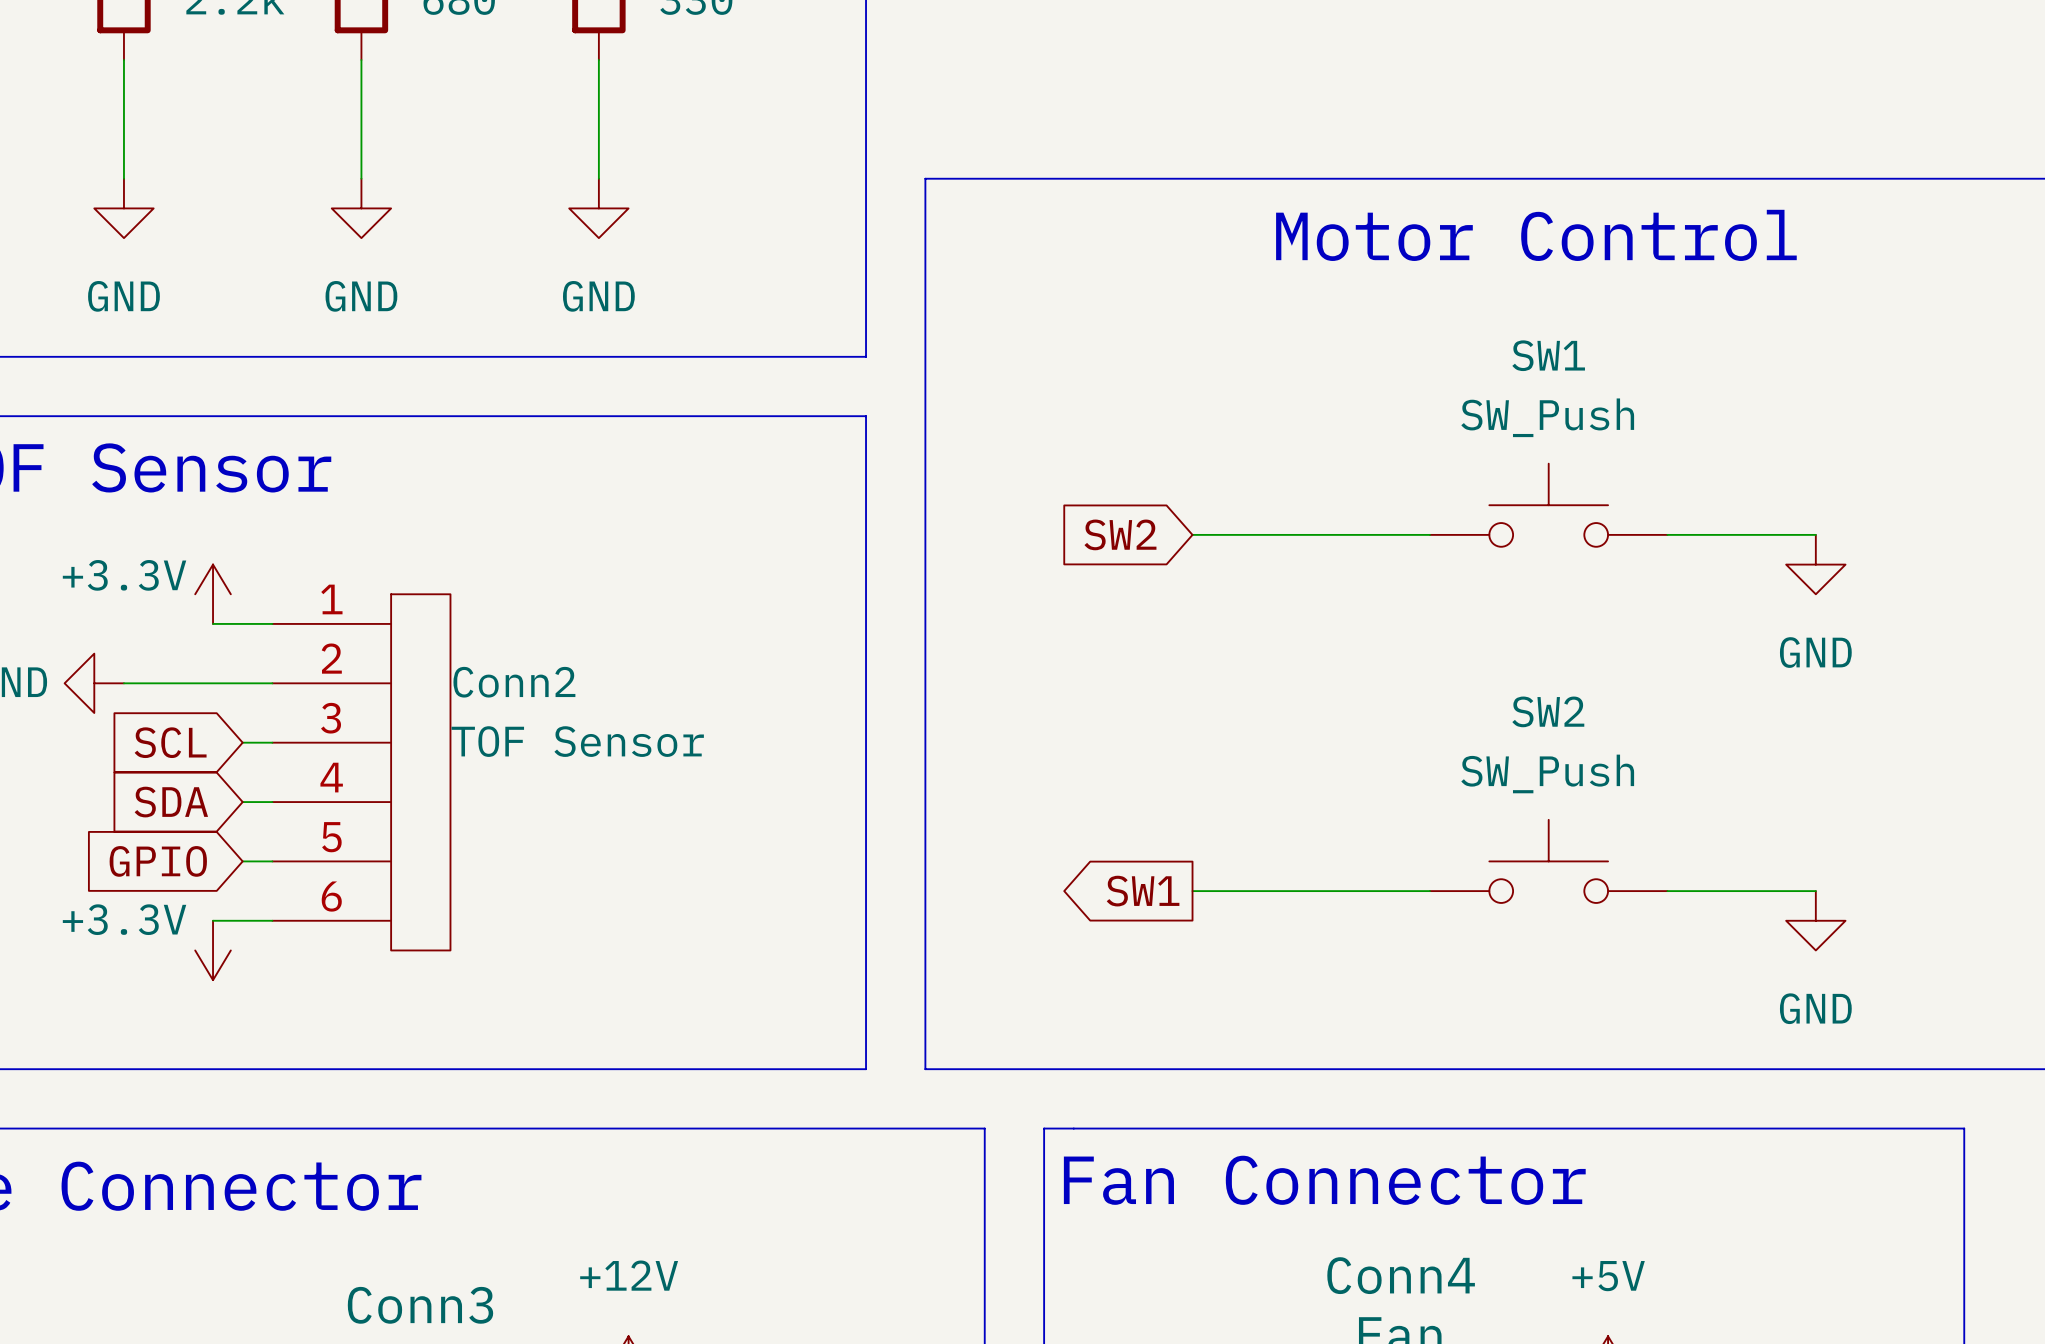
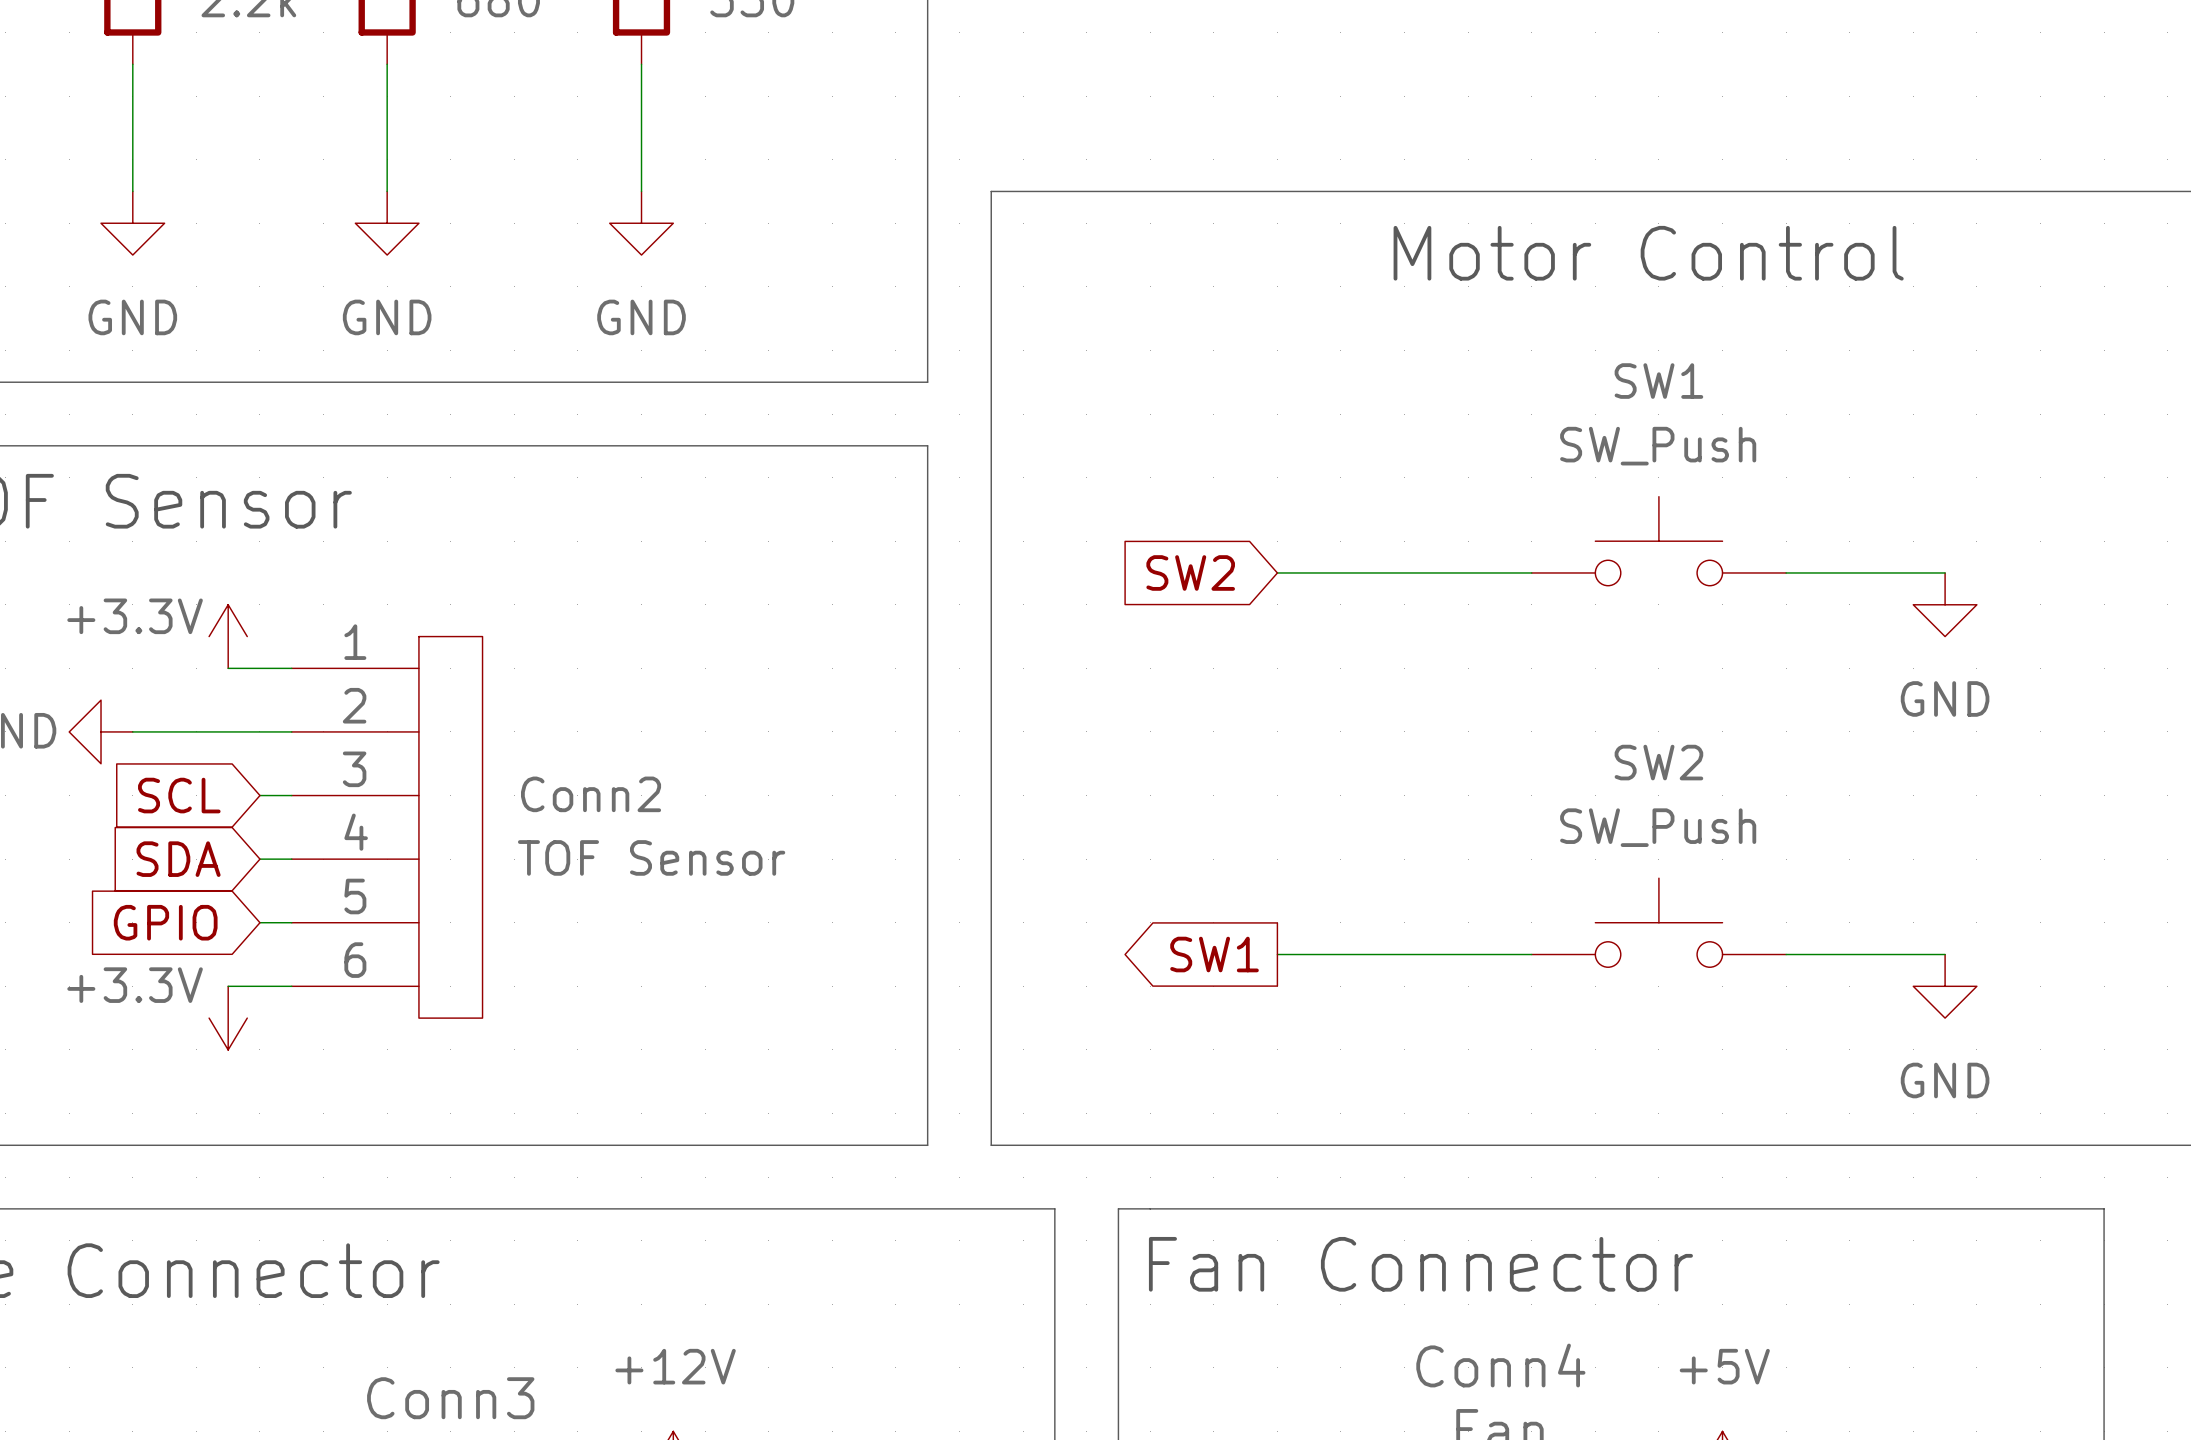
Conn2 name position: Conn2 (514, 682) -> Conn2 (591, 794)
Conn2 value position: TOF Sensor (577, 741) -> TOF Sensor (651, 857)

